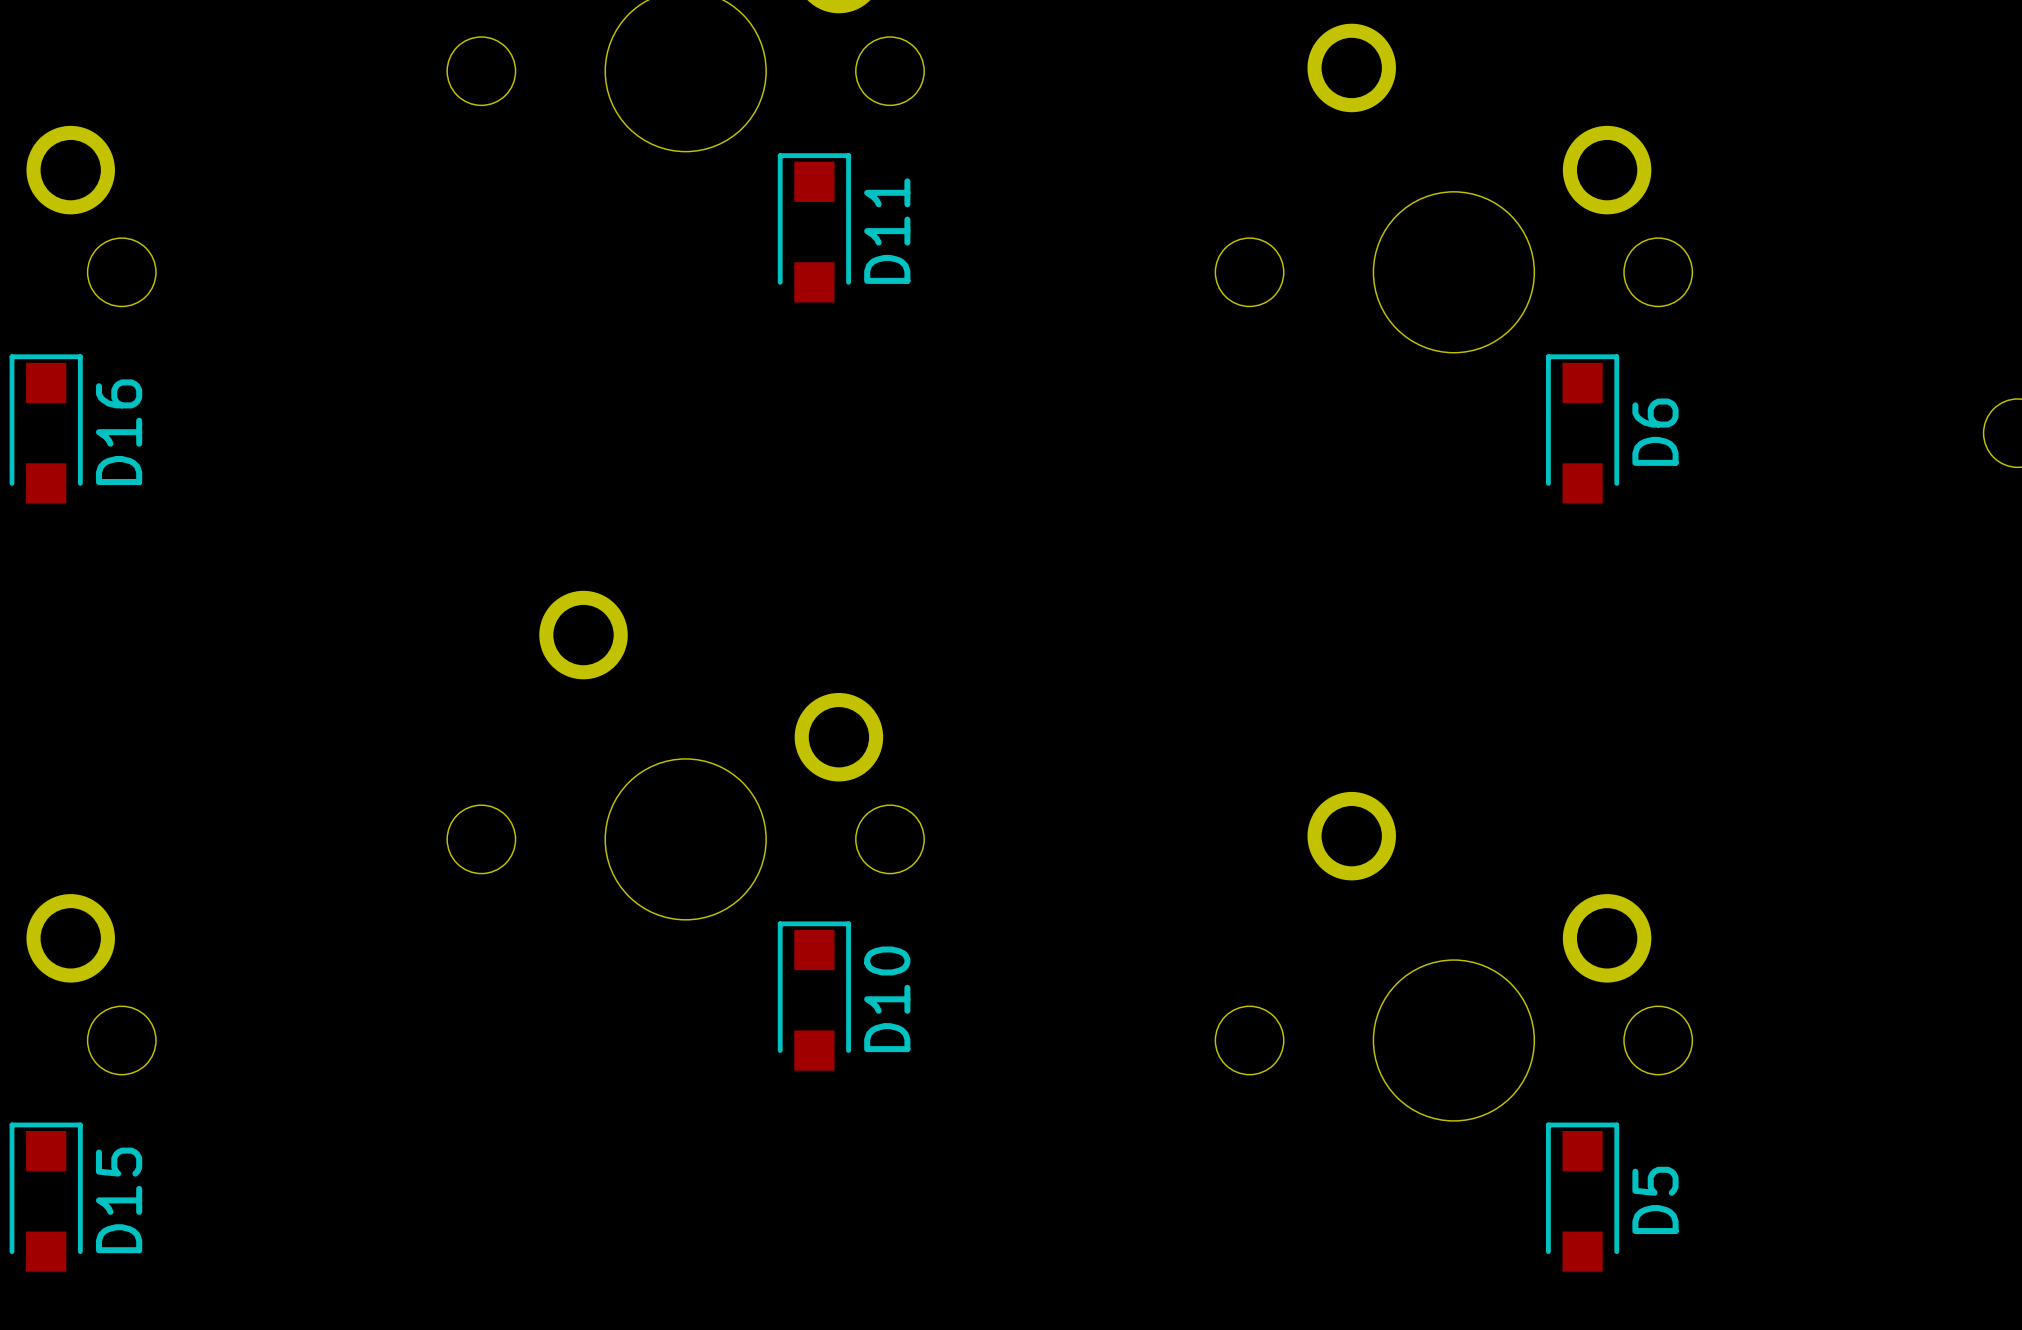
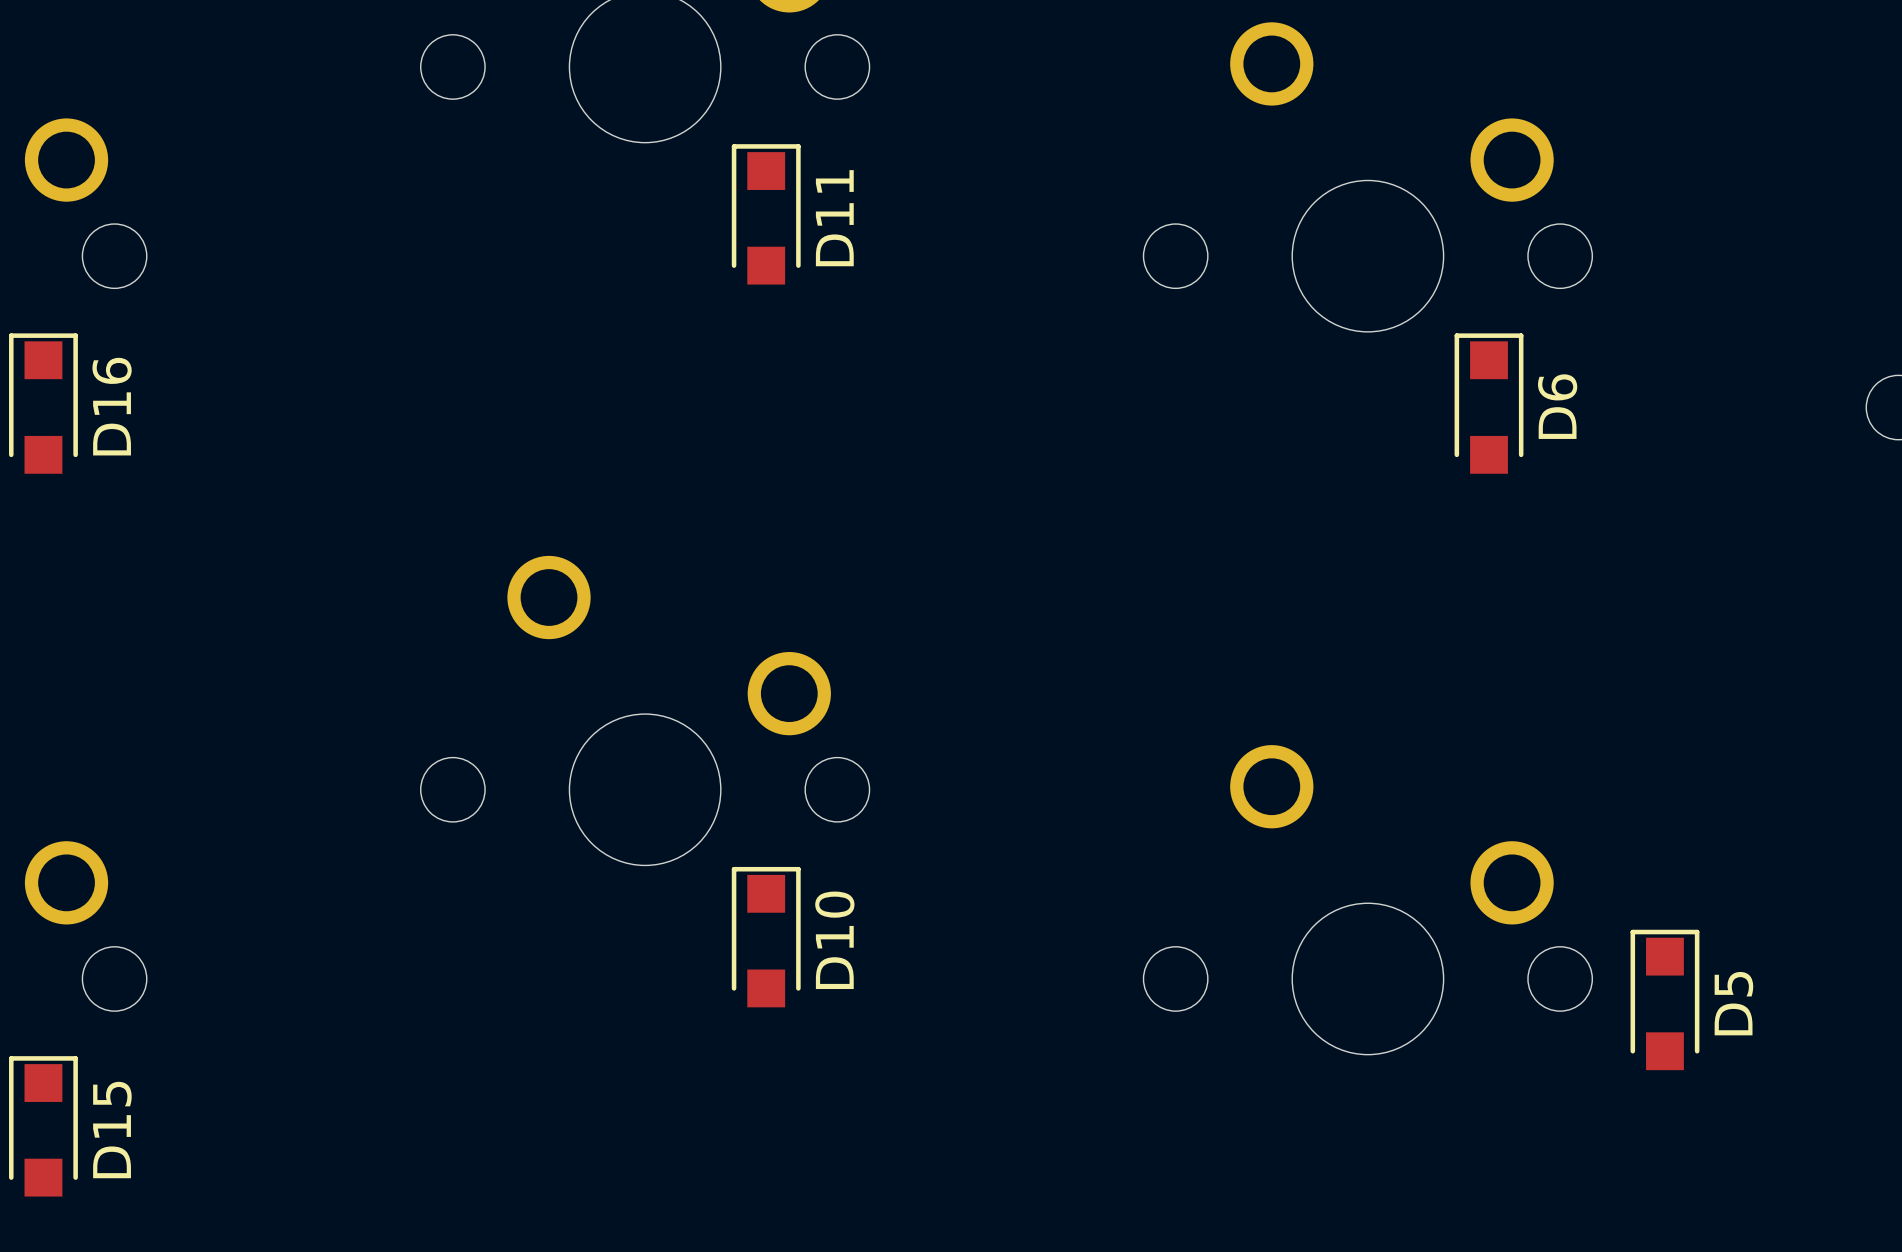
D5 position: (1582, 1197) -> (1664, 999)

